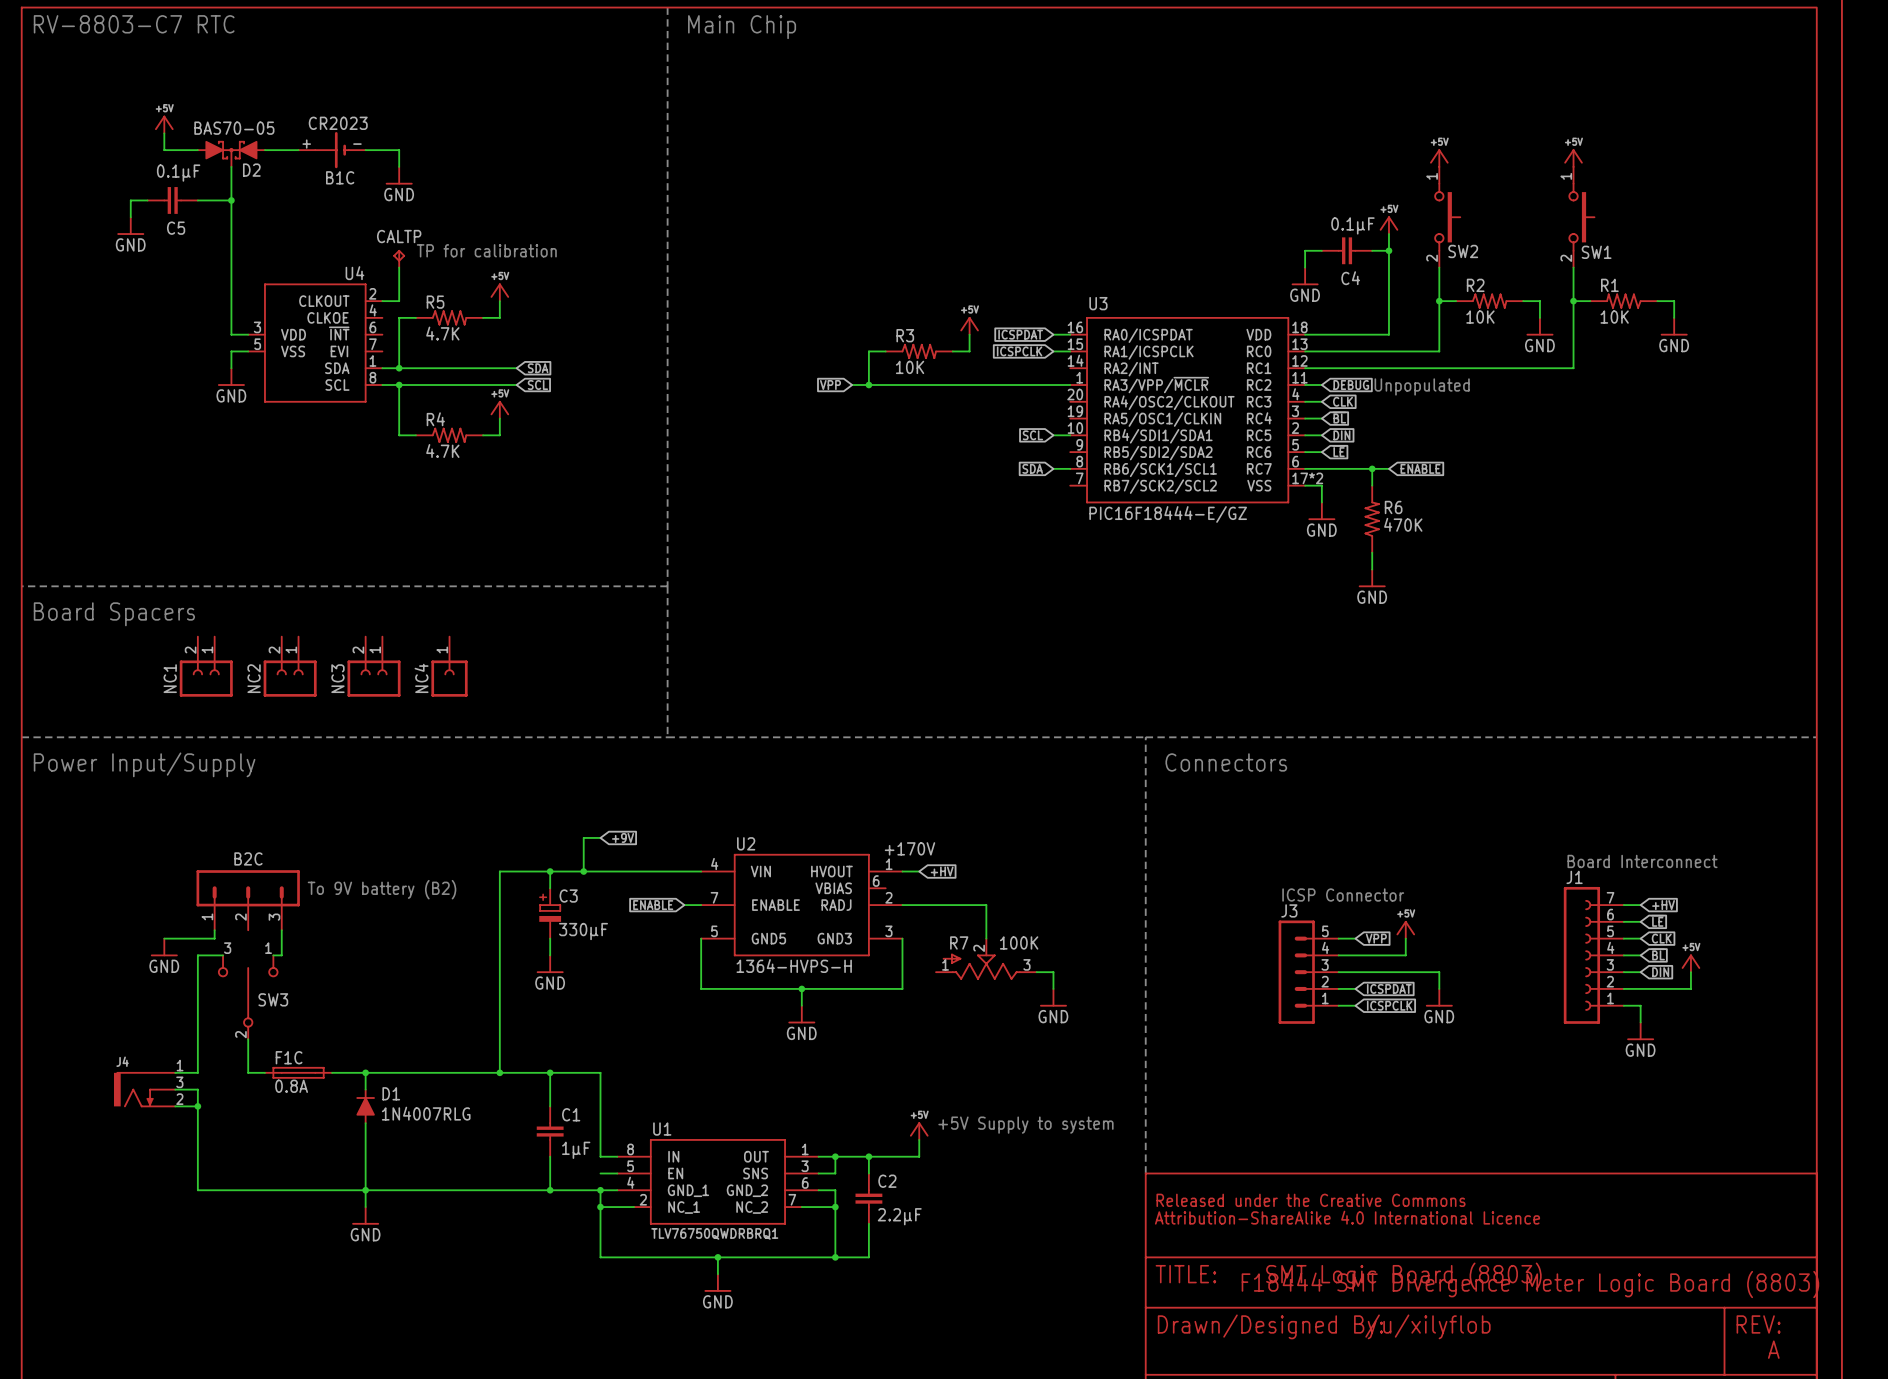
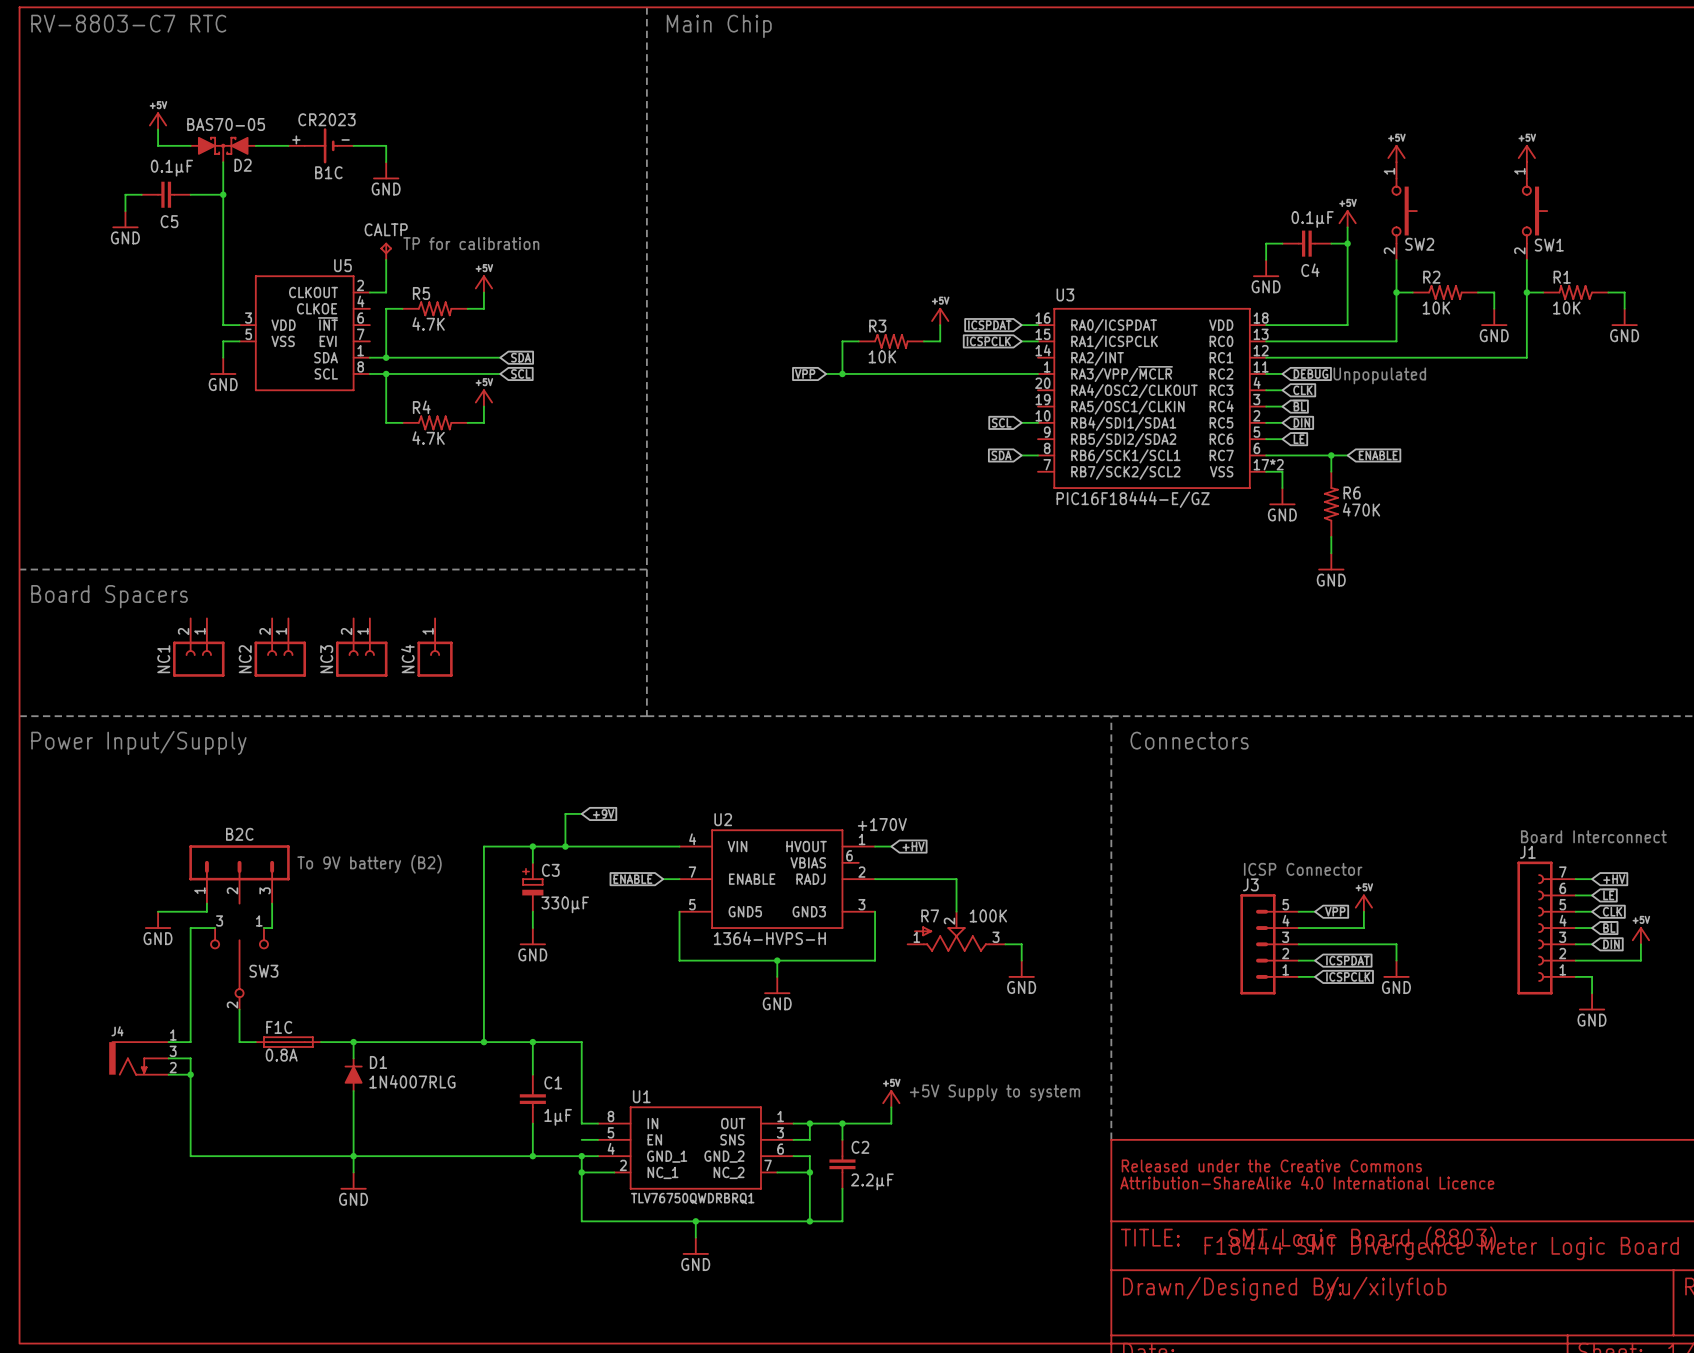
U4 name: U4 (354, 273) -> U5 (342, 265)

